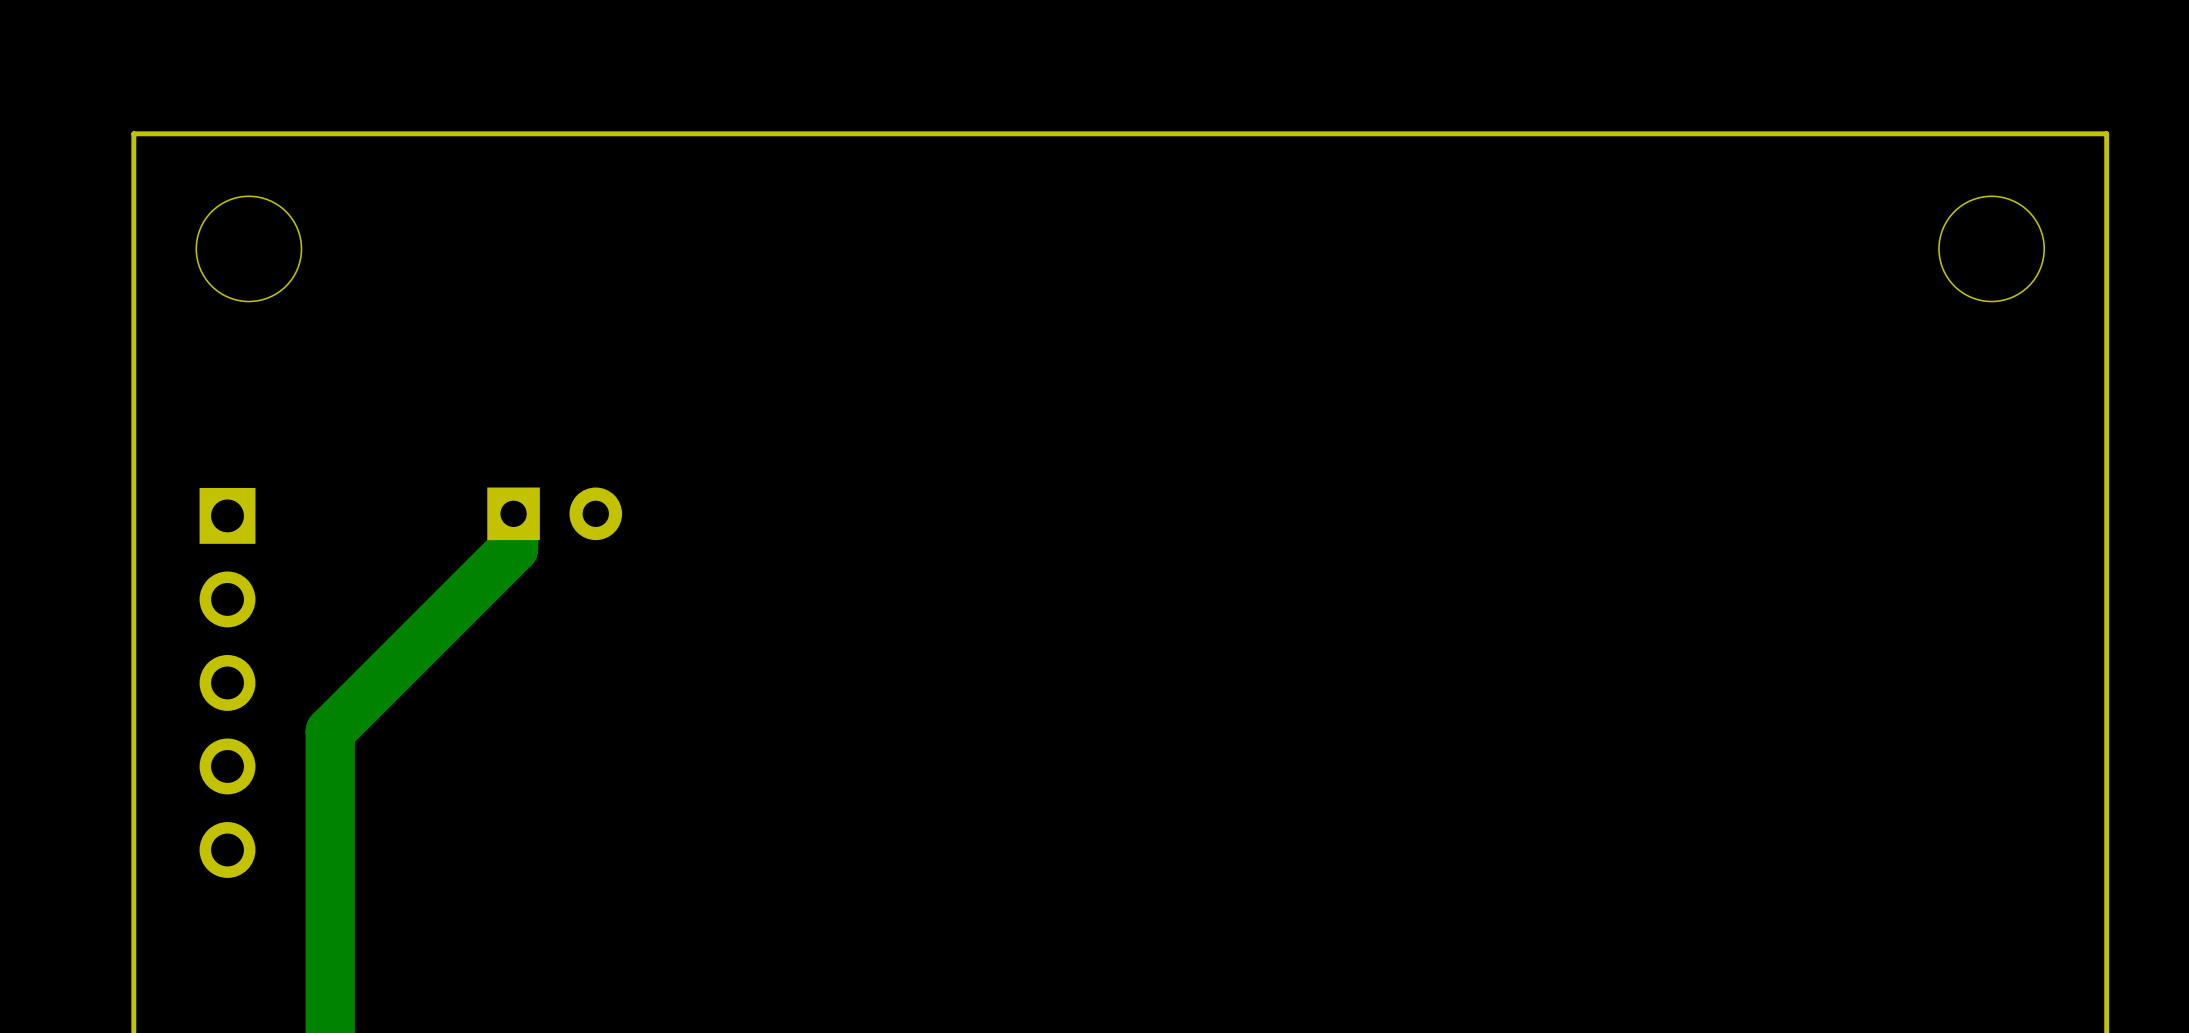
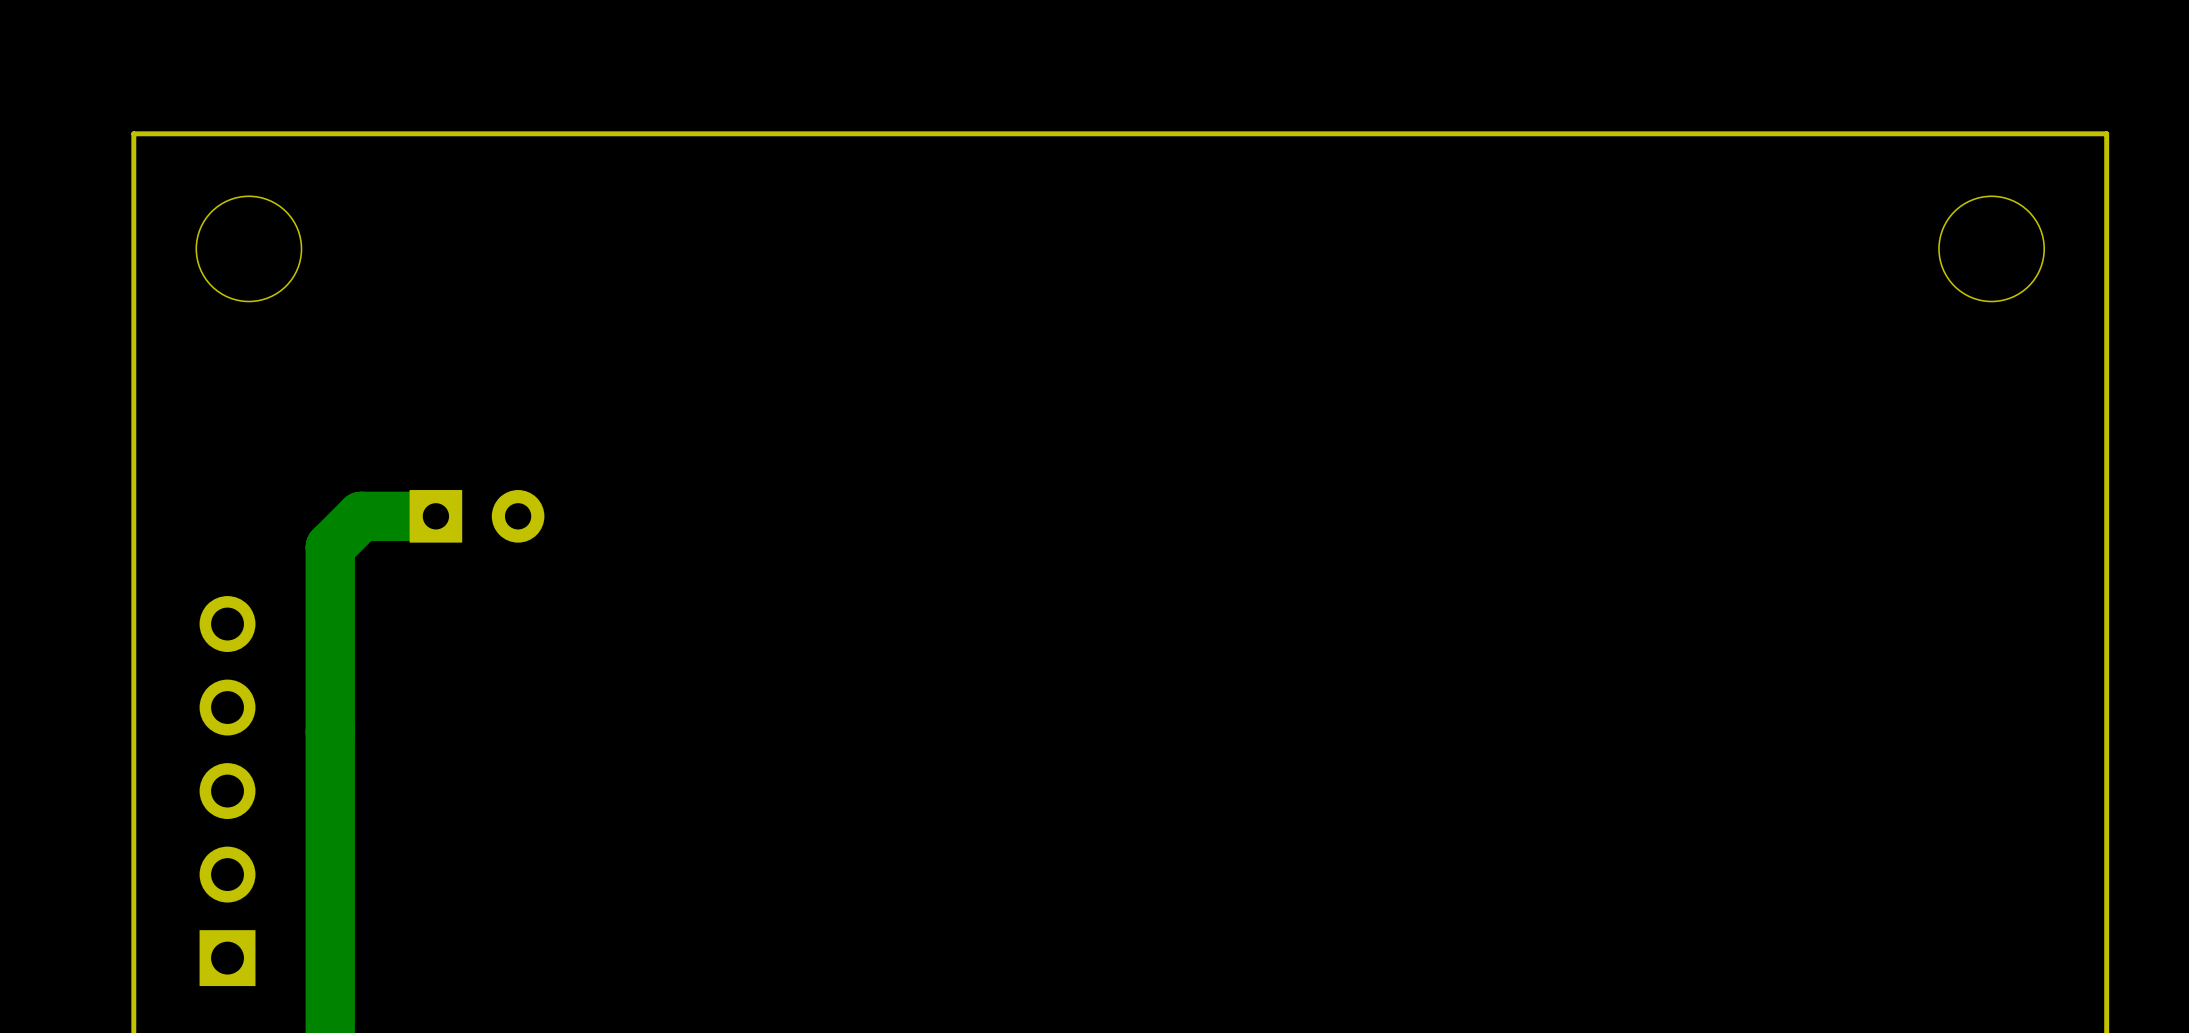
track: (513, 513) (513, 548) (330, 731) -> (435, 516) (361, 516) (330, 547) (330, 731)
part position: (554, 513) -> (477, 516)
part rotation: 0° (227, 682) -> 180° (227, 791)

